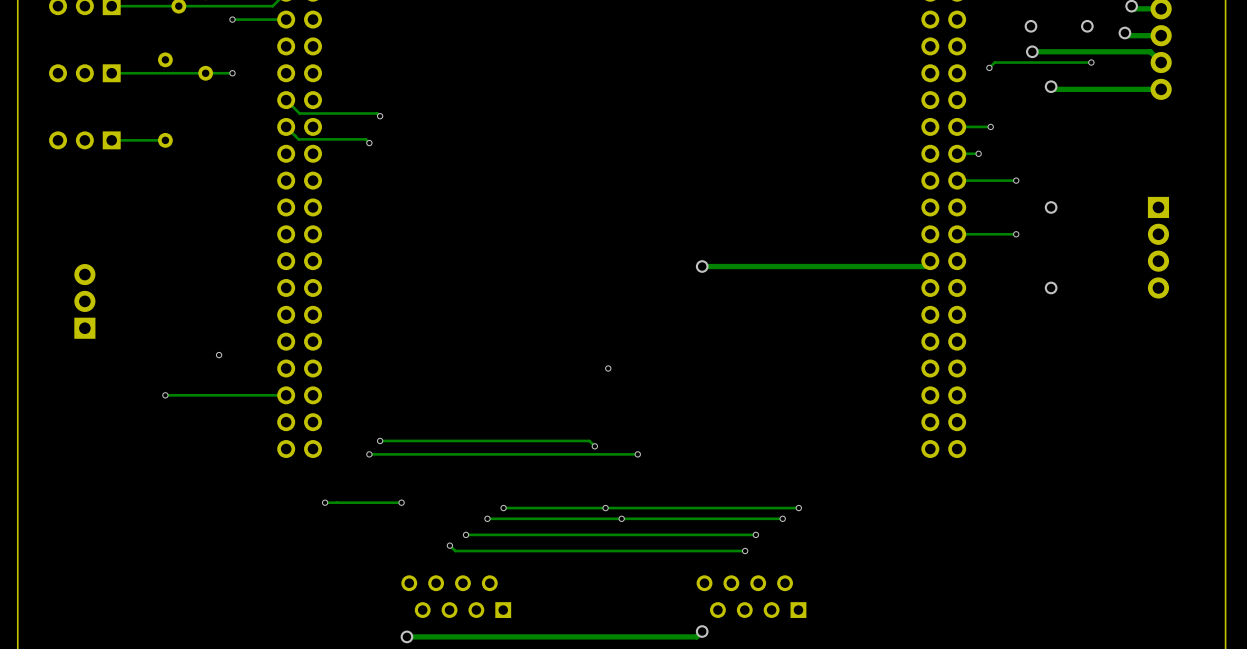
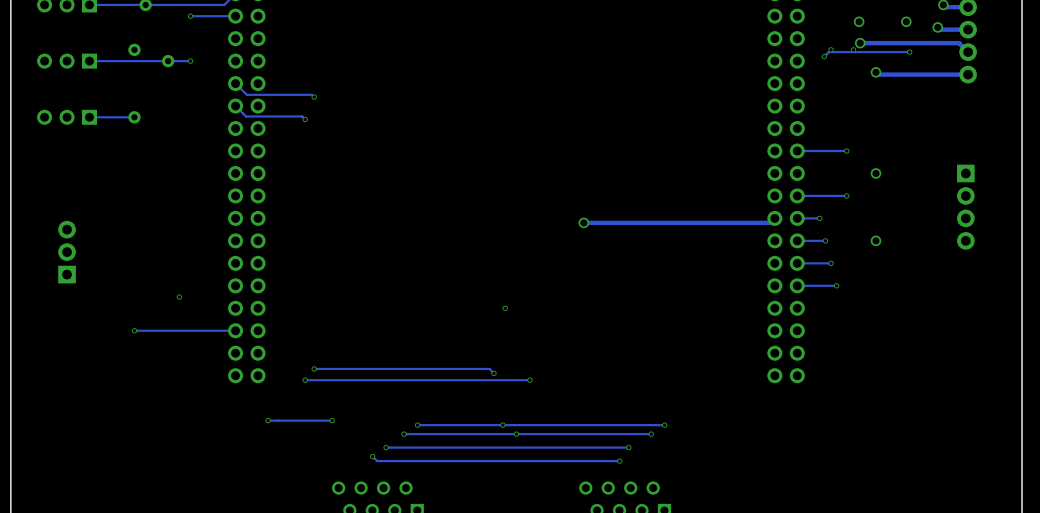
via: none -> (831, 49)
via: none -> (853, 49)
track: (990, 126) (957, 126) -> (825, 240) (797, 240)
via: (990, 126) -> none
track: (978, 153) (957, 153) -> none
via: (978, 153) -> none
track: none -> (819, 218) (797, 218)
via: none -> (819, 218)
via: none -> (825, 240)
track: none -> (831, 263) (797, 263)
via: none -> (831, 263)
track: none -> (836, 285) (797, 285)
via: none -> (836, 285)

